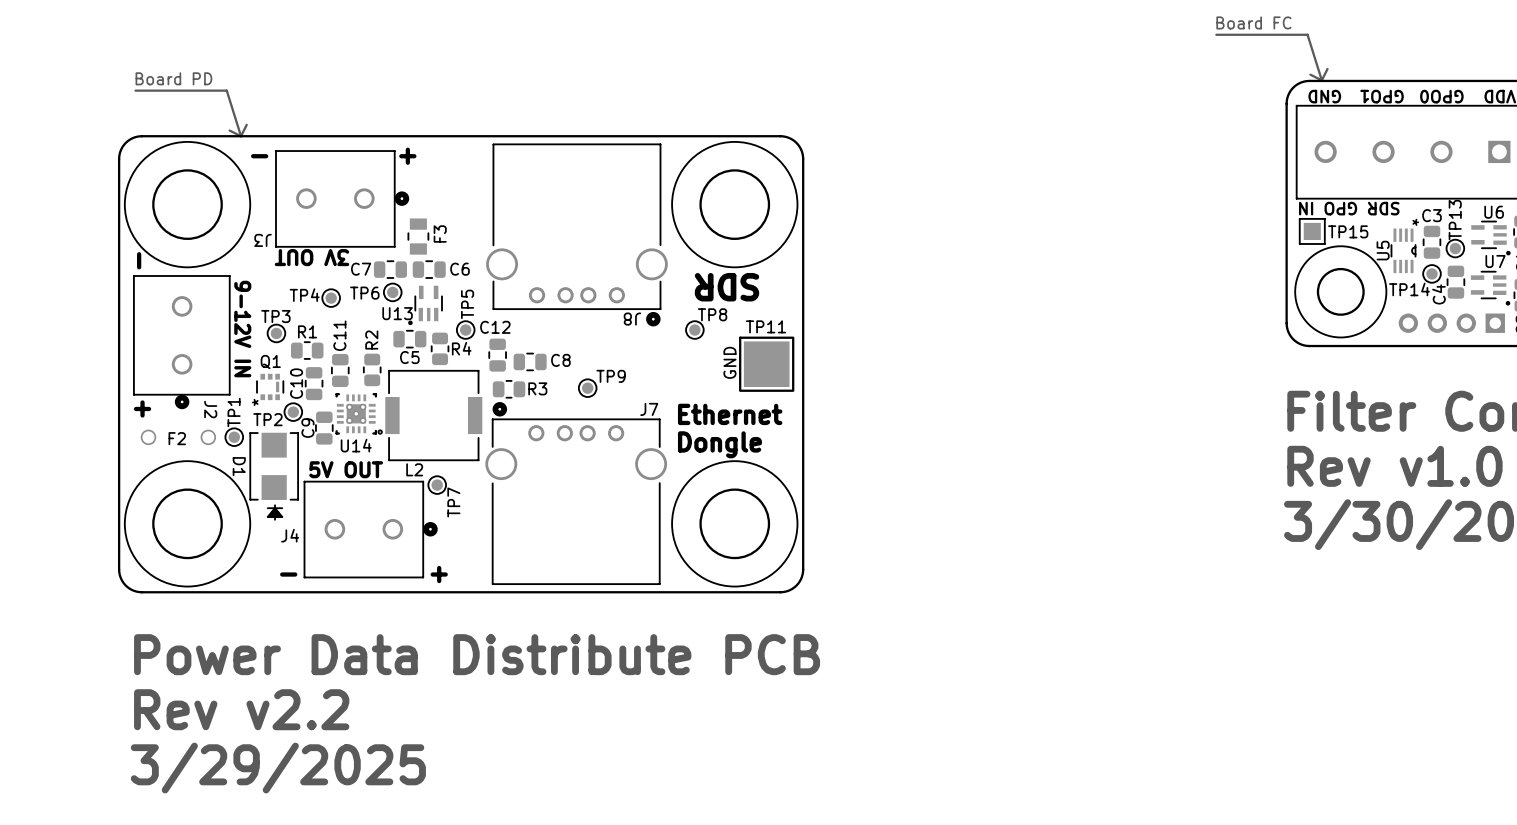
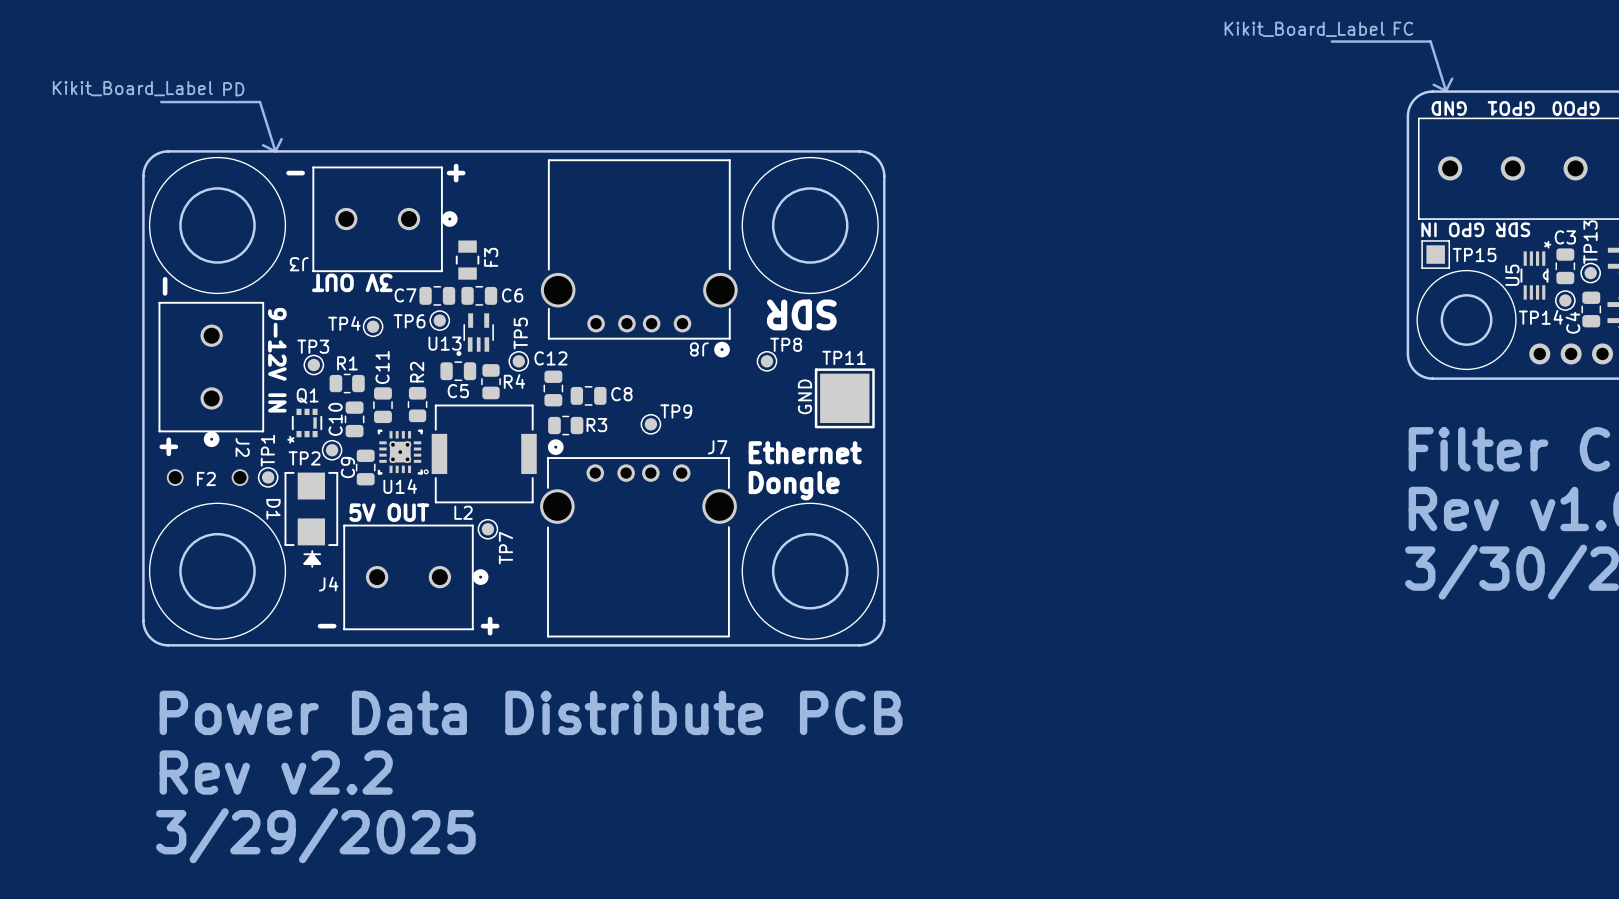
FC value: Board (1239, 22) -> Kikit_Board_Label (1304, 29)
PD value: Board (158, 78) -> Kikit_Board_Label (132, 88)

